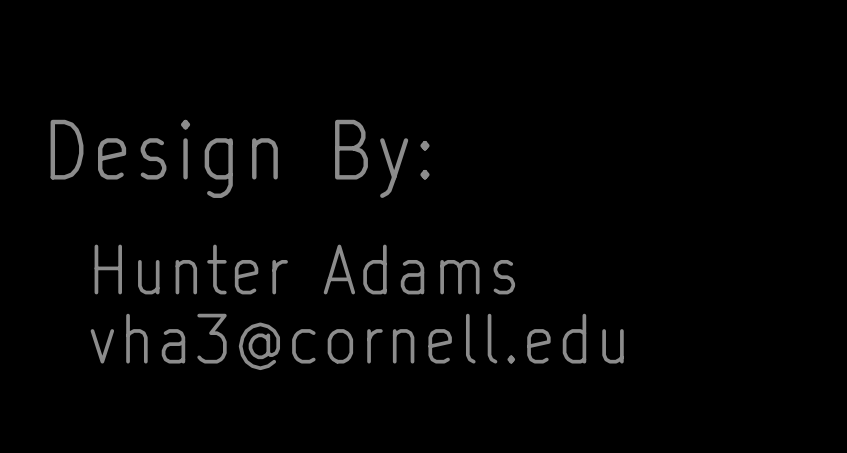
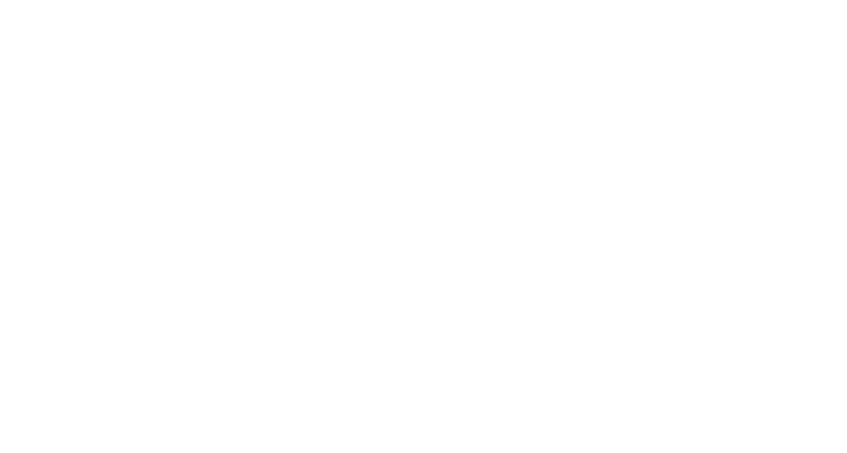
text: Design By: (240, 158) -> none
text: Hunter Adams (304, 269) -> none
text: vha3@cornell.edu (357, 341) -> none

